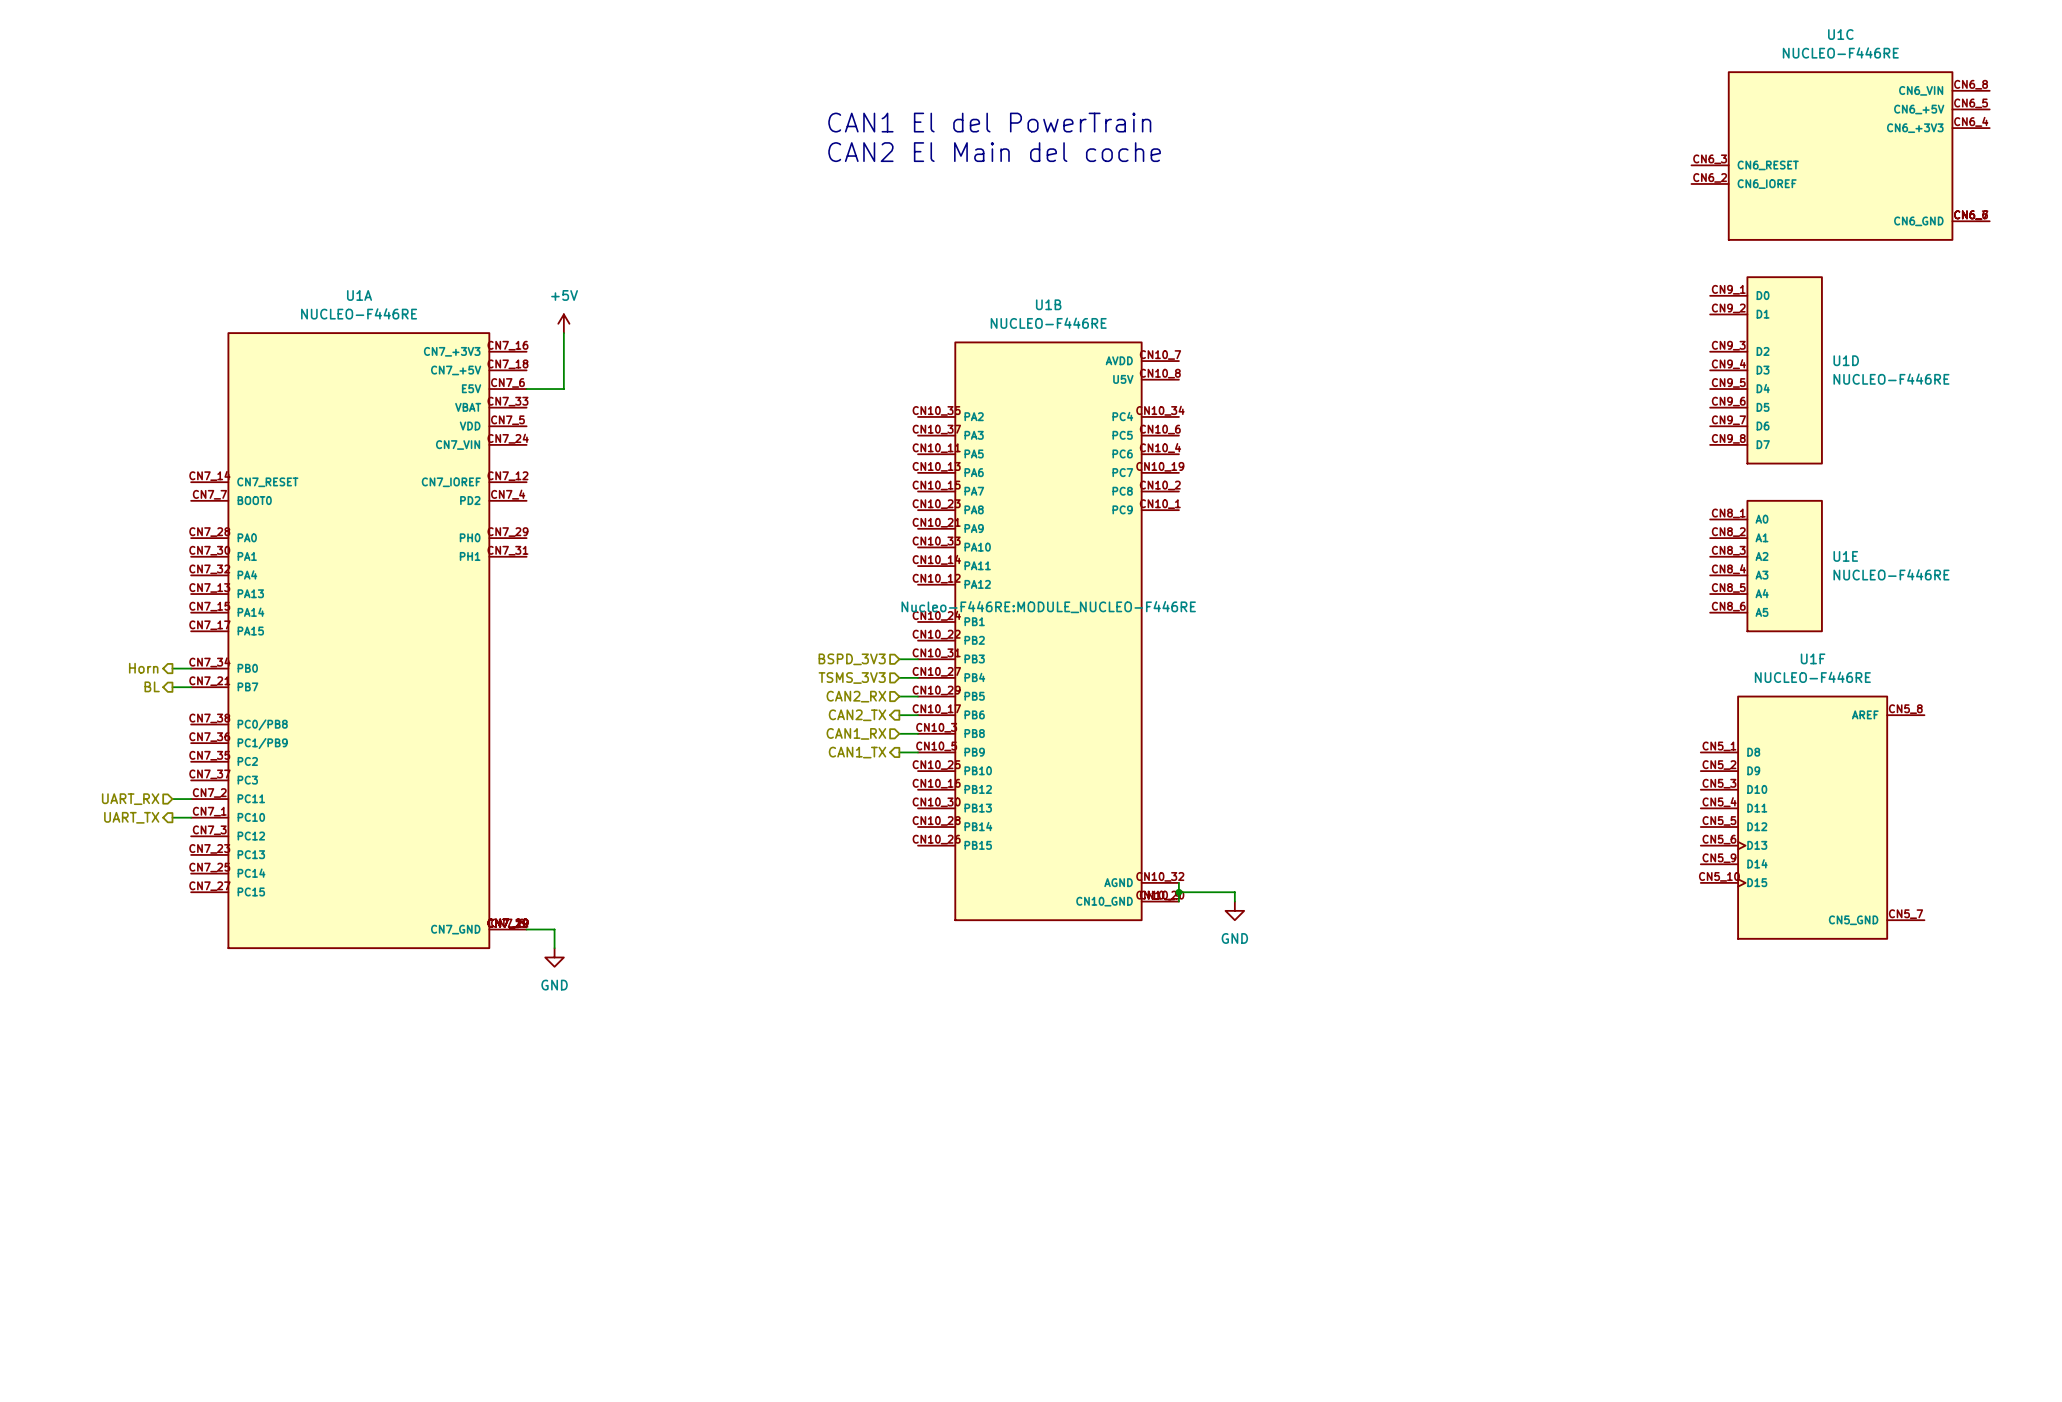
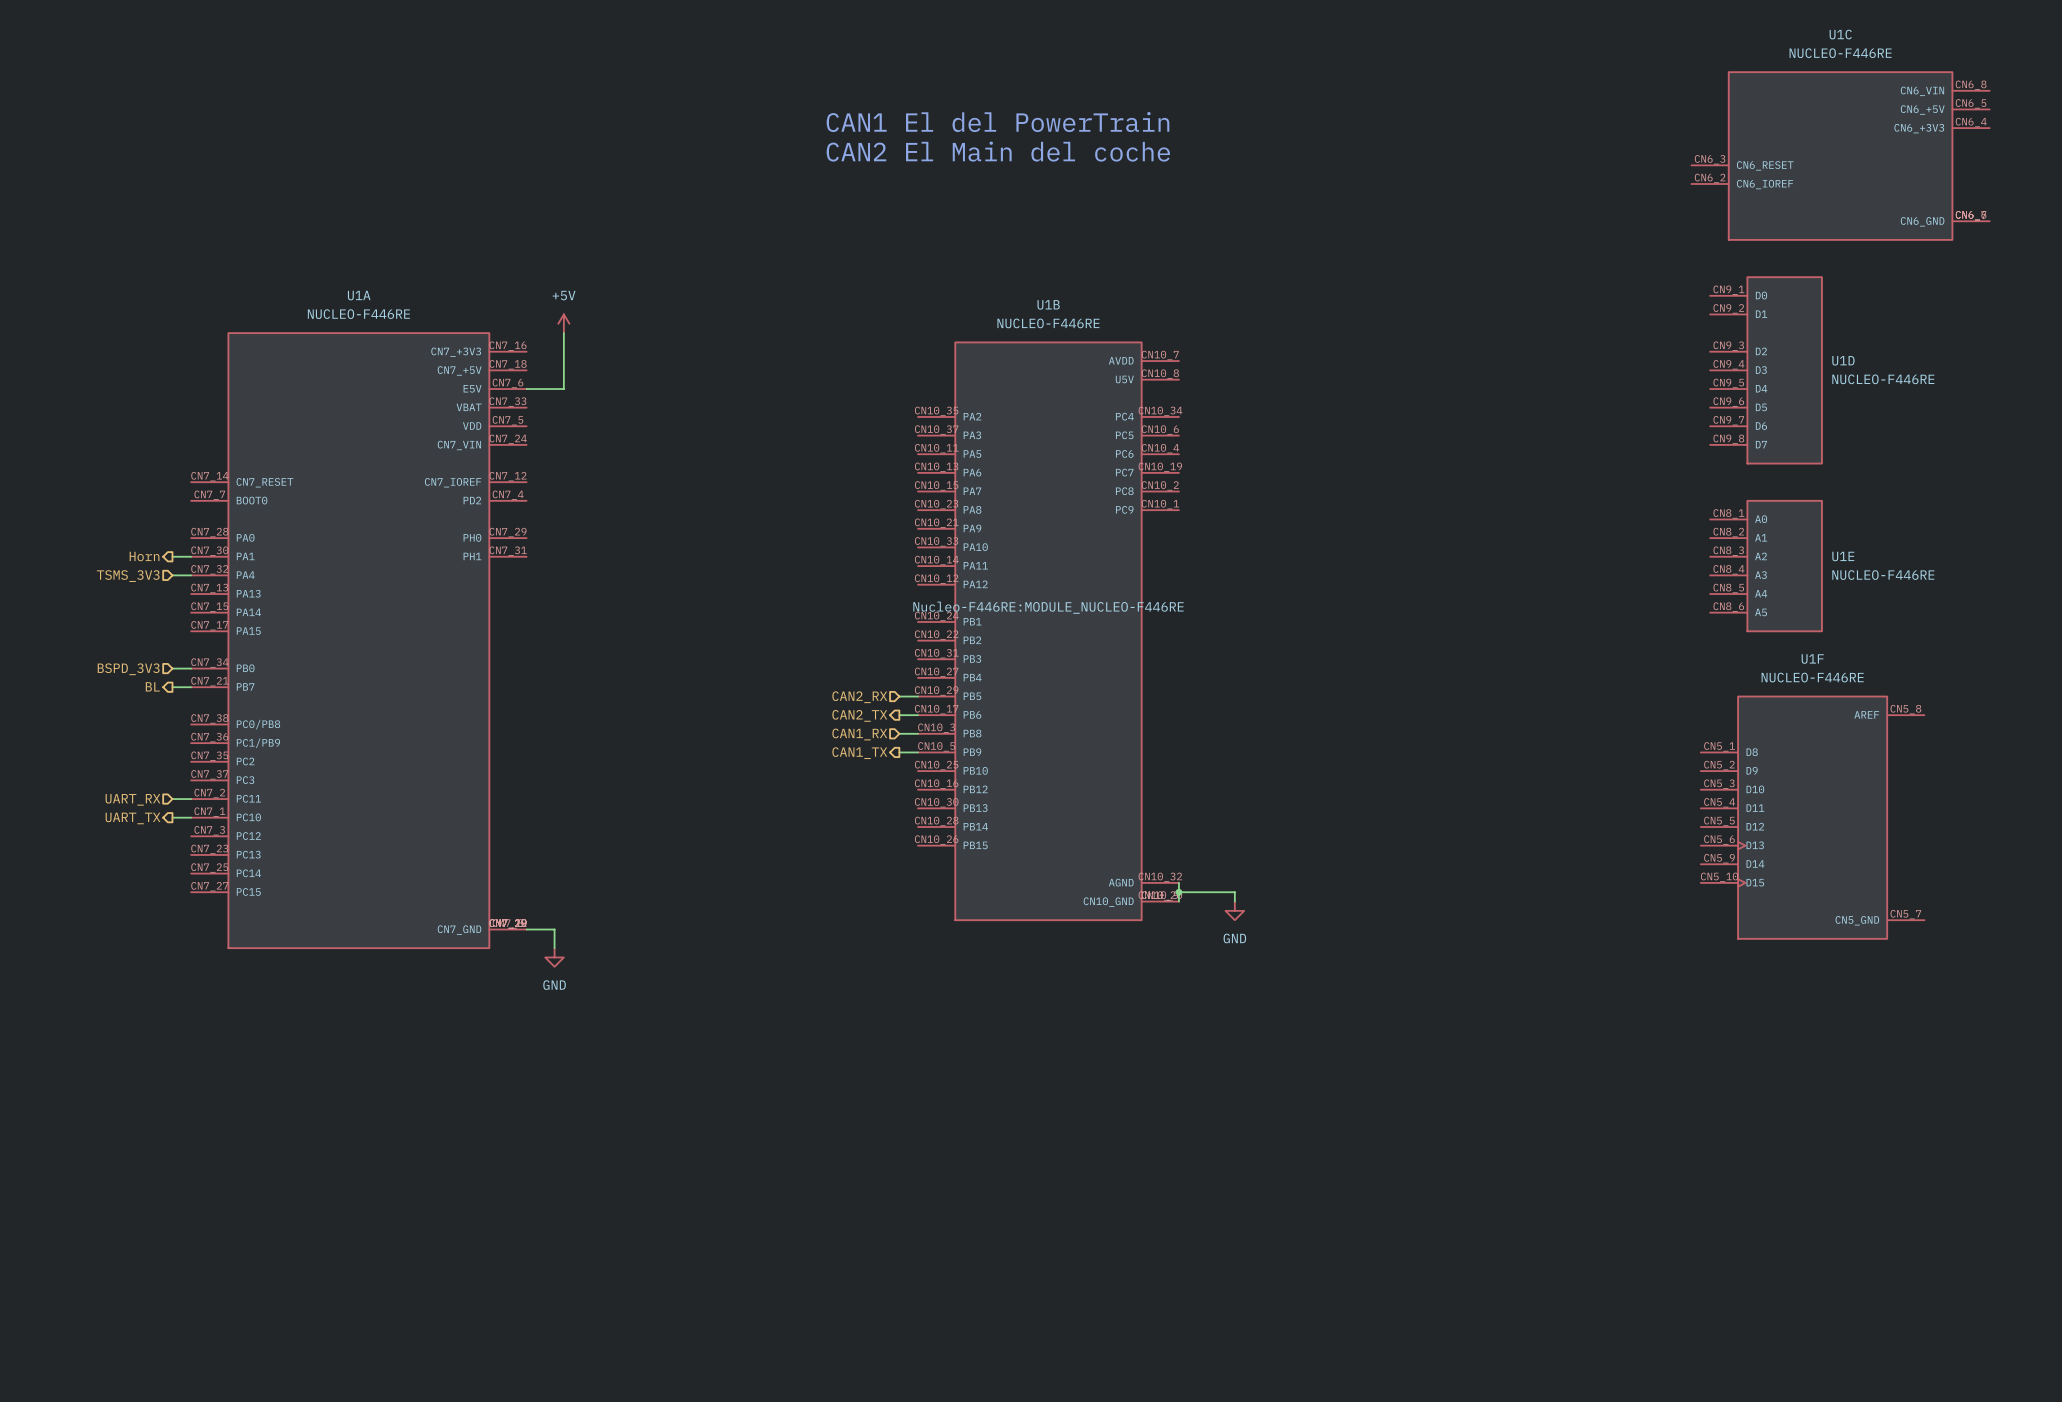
hierarchical label: none -> Horn (144, 556)
wire: none -> (172, 556) (191, 556)
hierarchical label: none -> TSMS_3V3 (128, 576)
wire: none -> (172, 575) (191, 575)
hierarchical label: BSPD_3V3 (852, 659) -> none
wire: (899, 659) (918, 659) -> none
hierarchical label shape: output (143, 668) -> input (128, 669)
hierarchical label: Horn (143, 668) -> BSPD_3V3 (128, 669)
hierarchical label: TSMS_3V3 (852, 677) -> none
wire: (899, 677) (918, 677) -> none

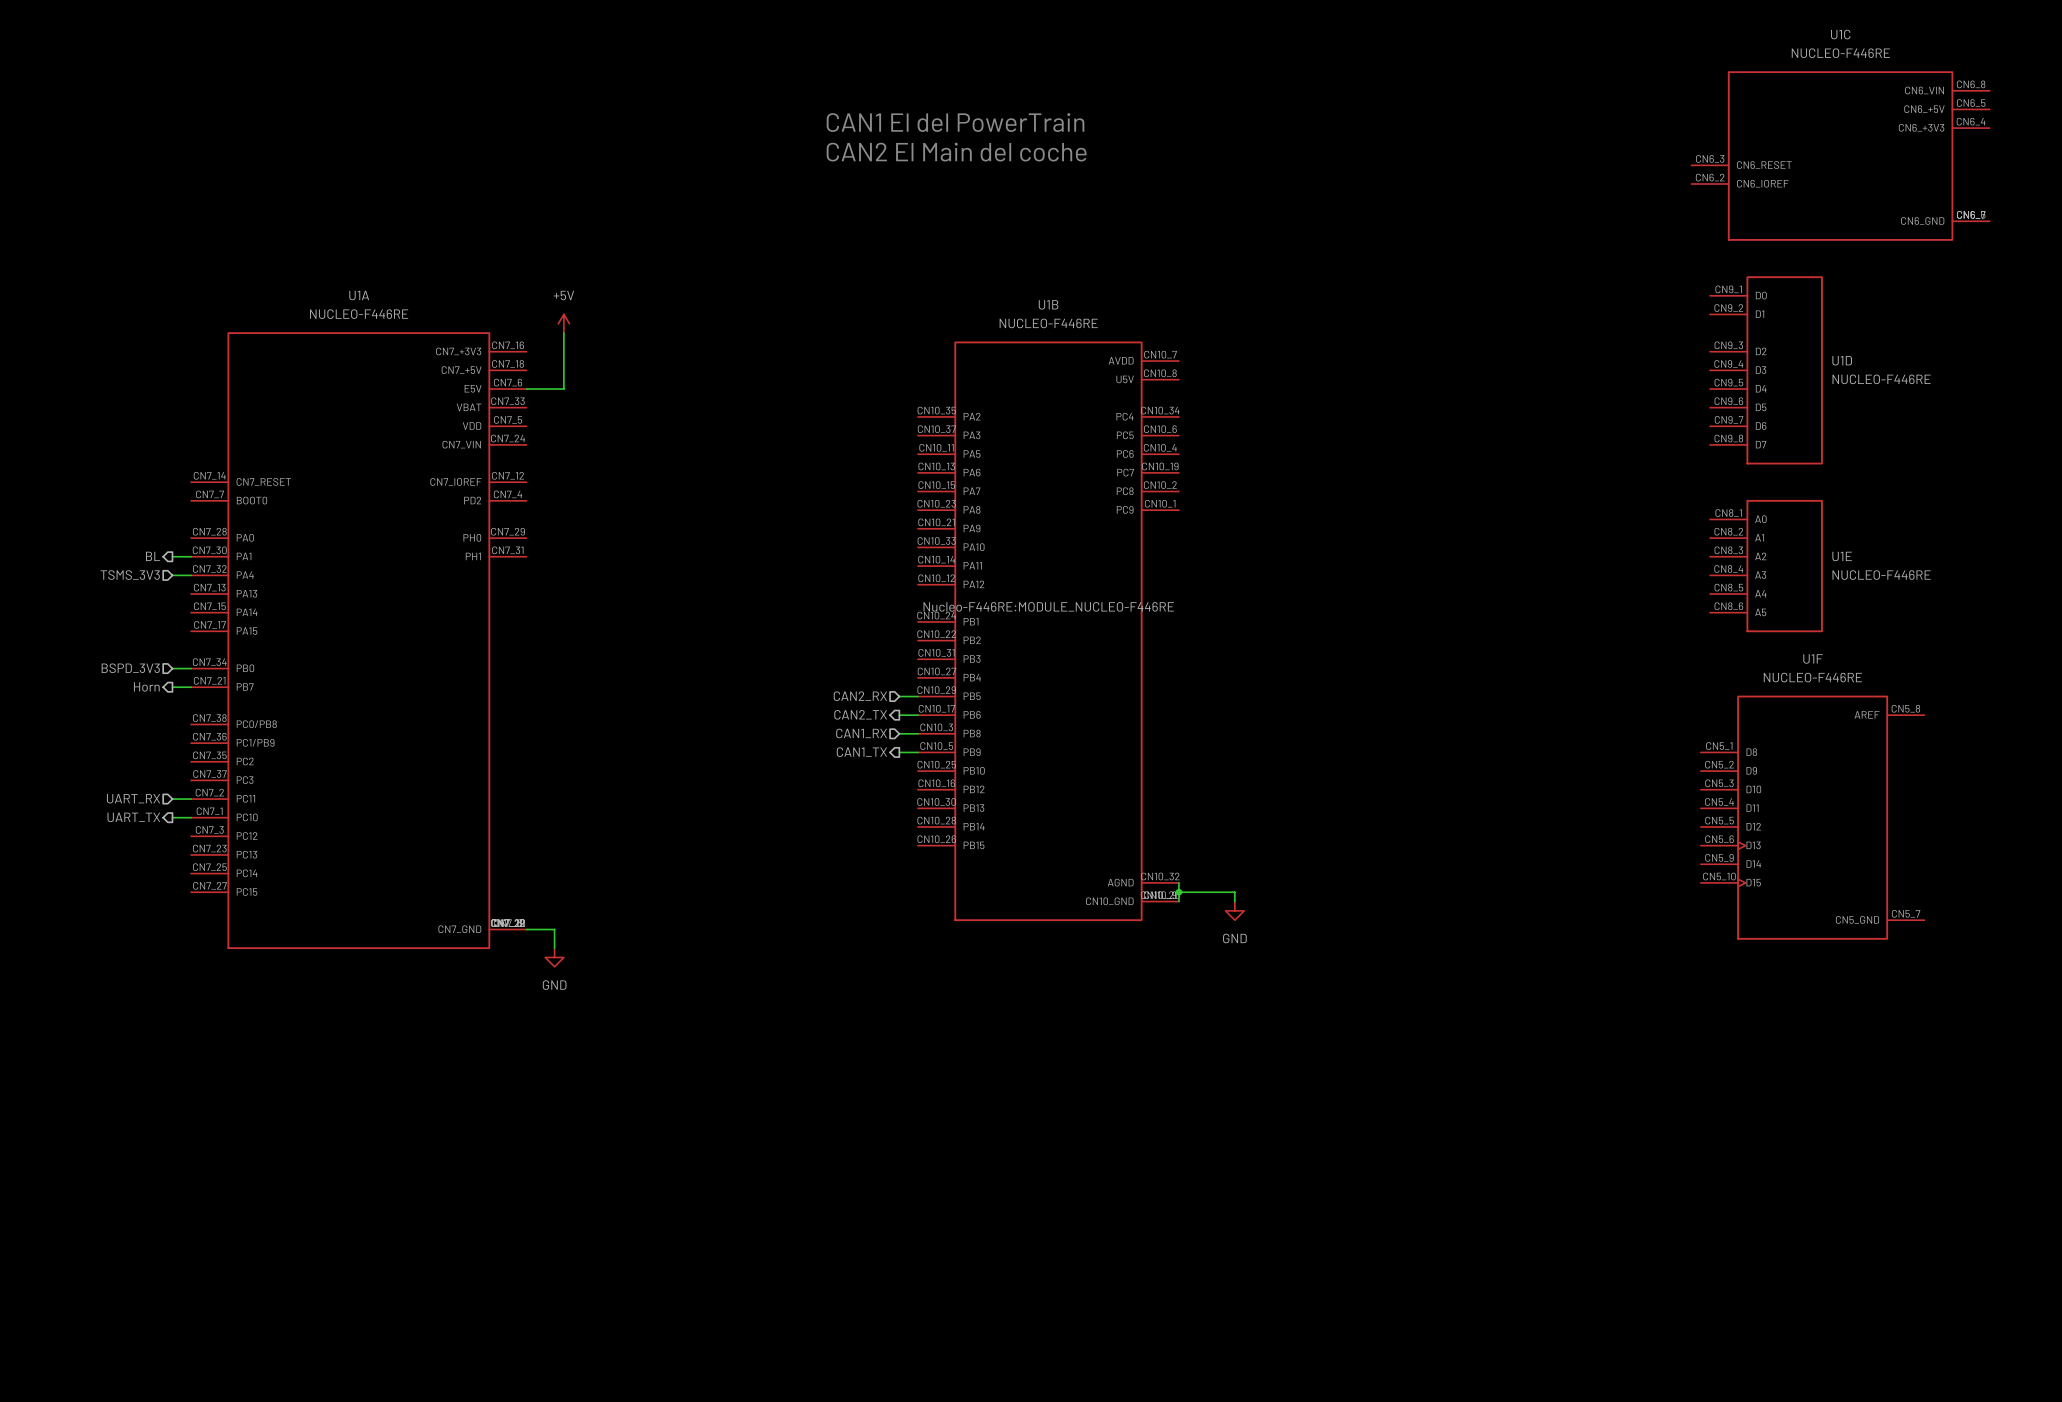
hierarchical label: Horn (144, 556) -> BL (153, 556)
hierarchical label: BL (152, 686) -> Horn (146, 686)

